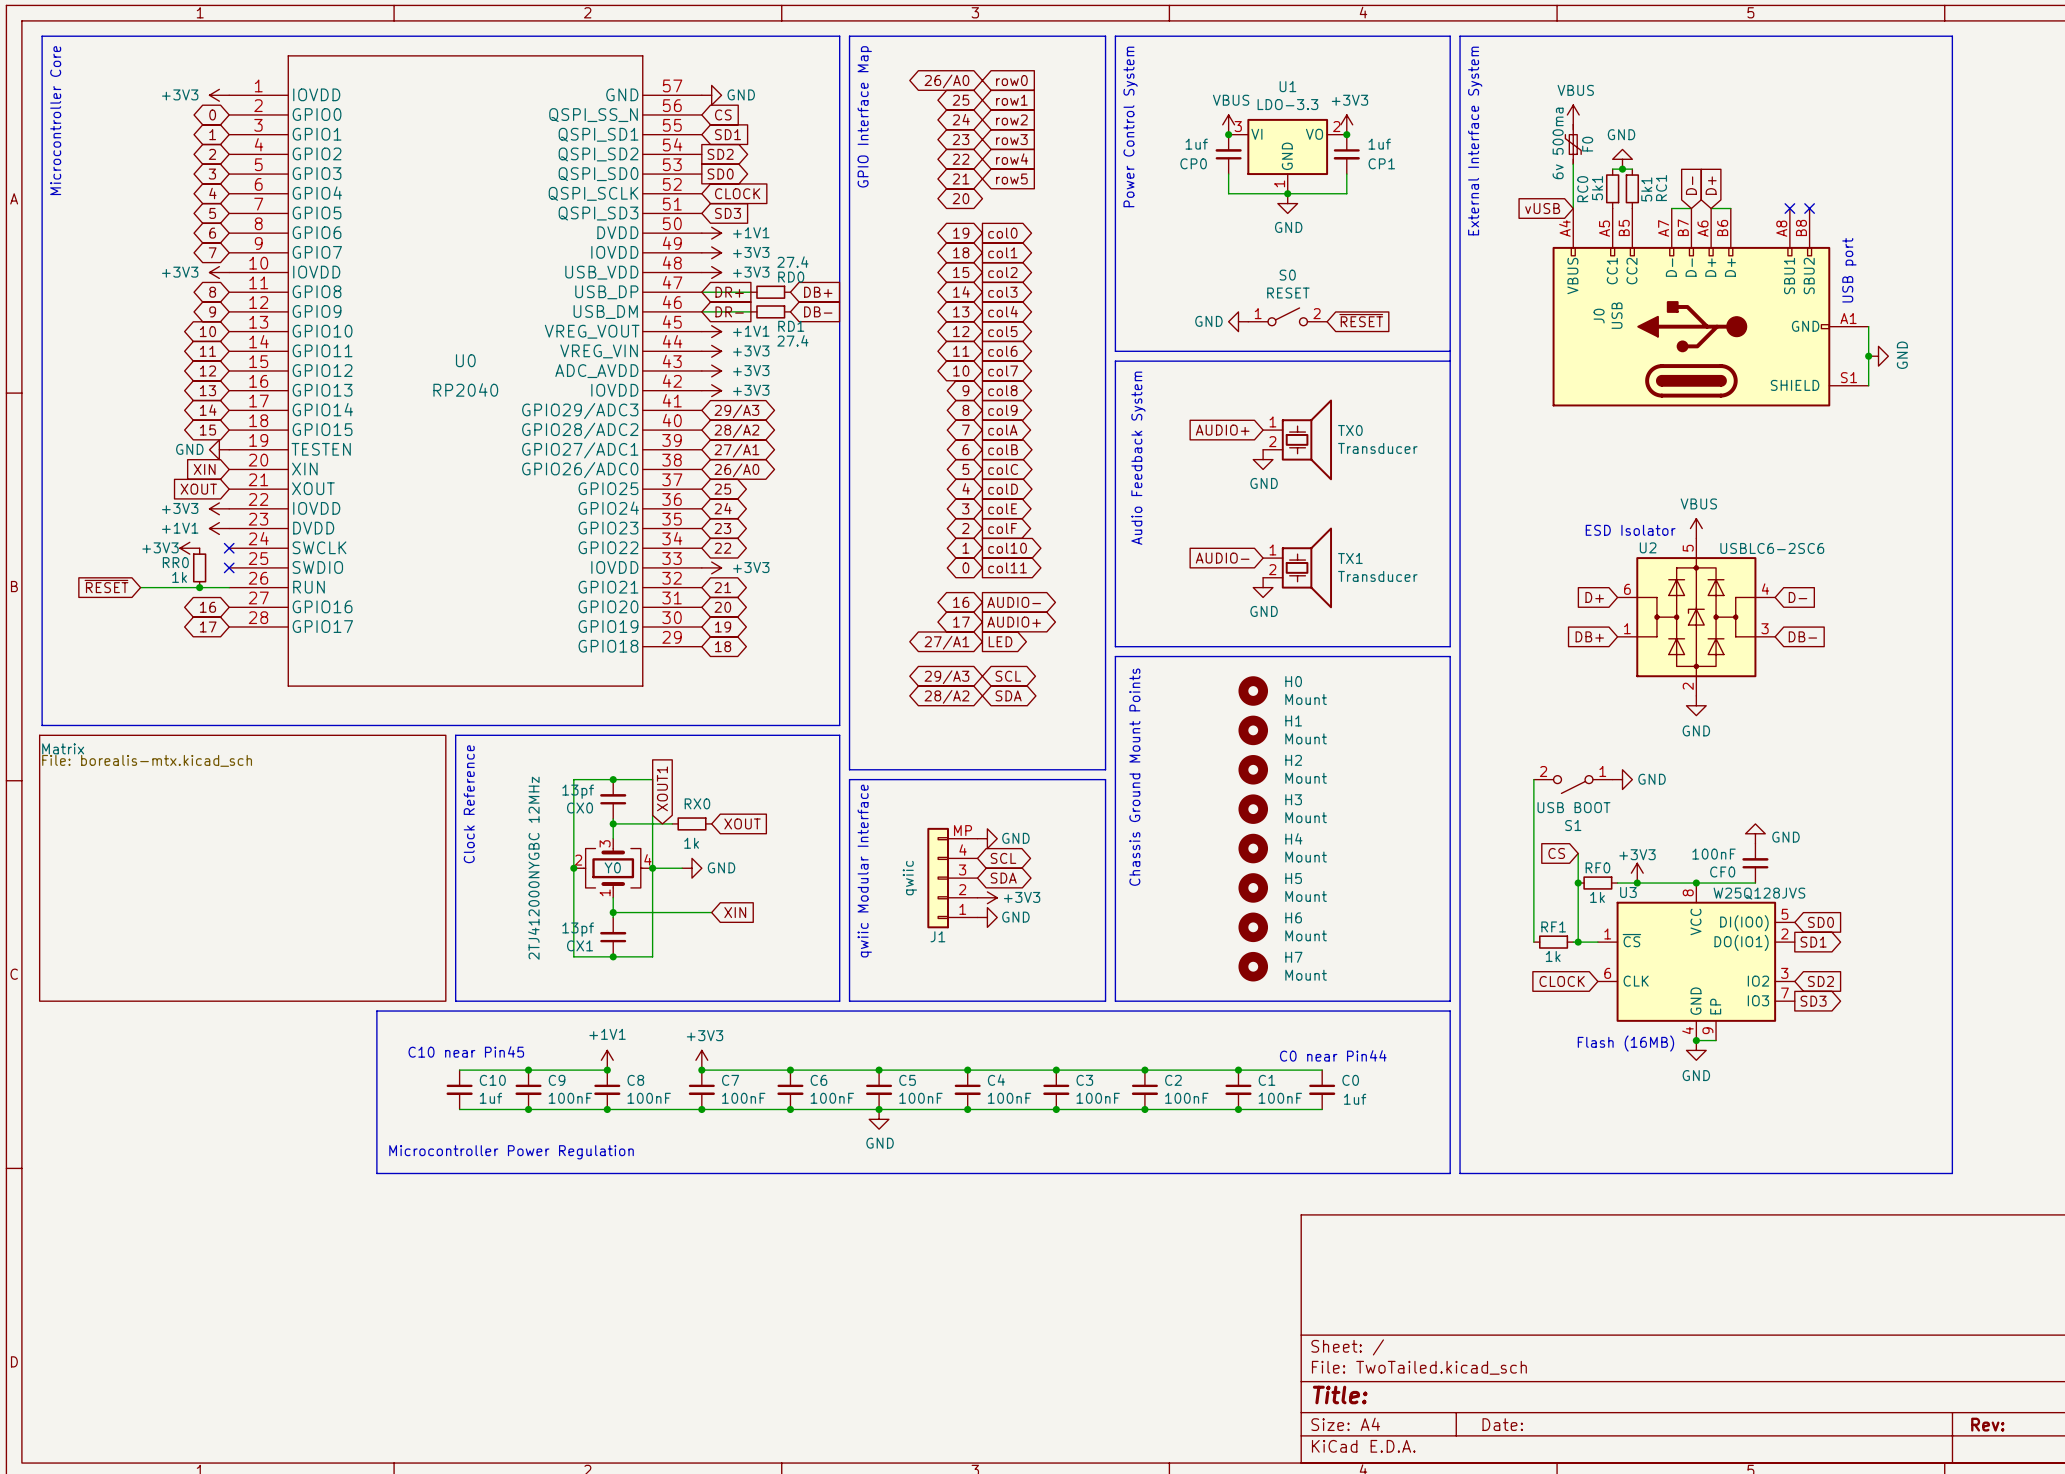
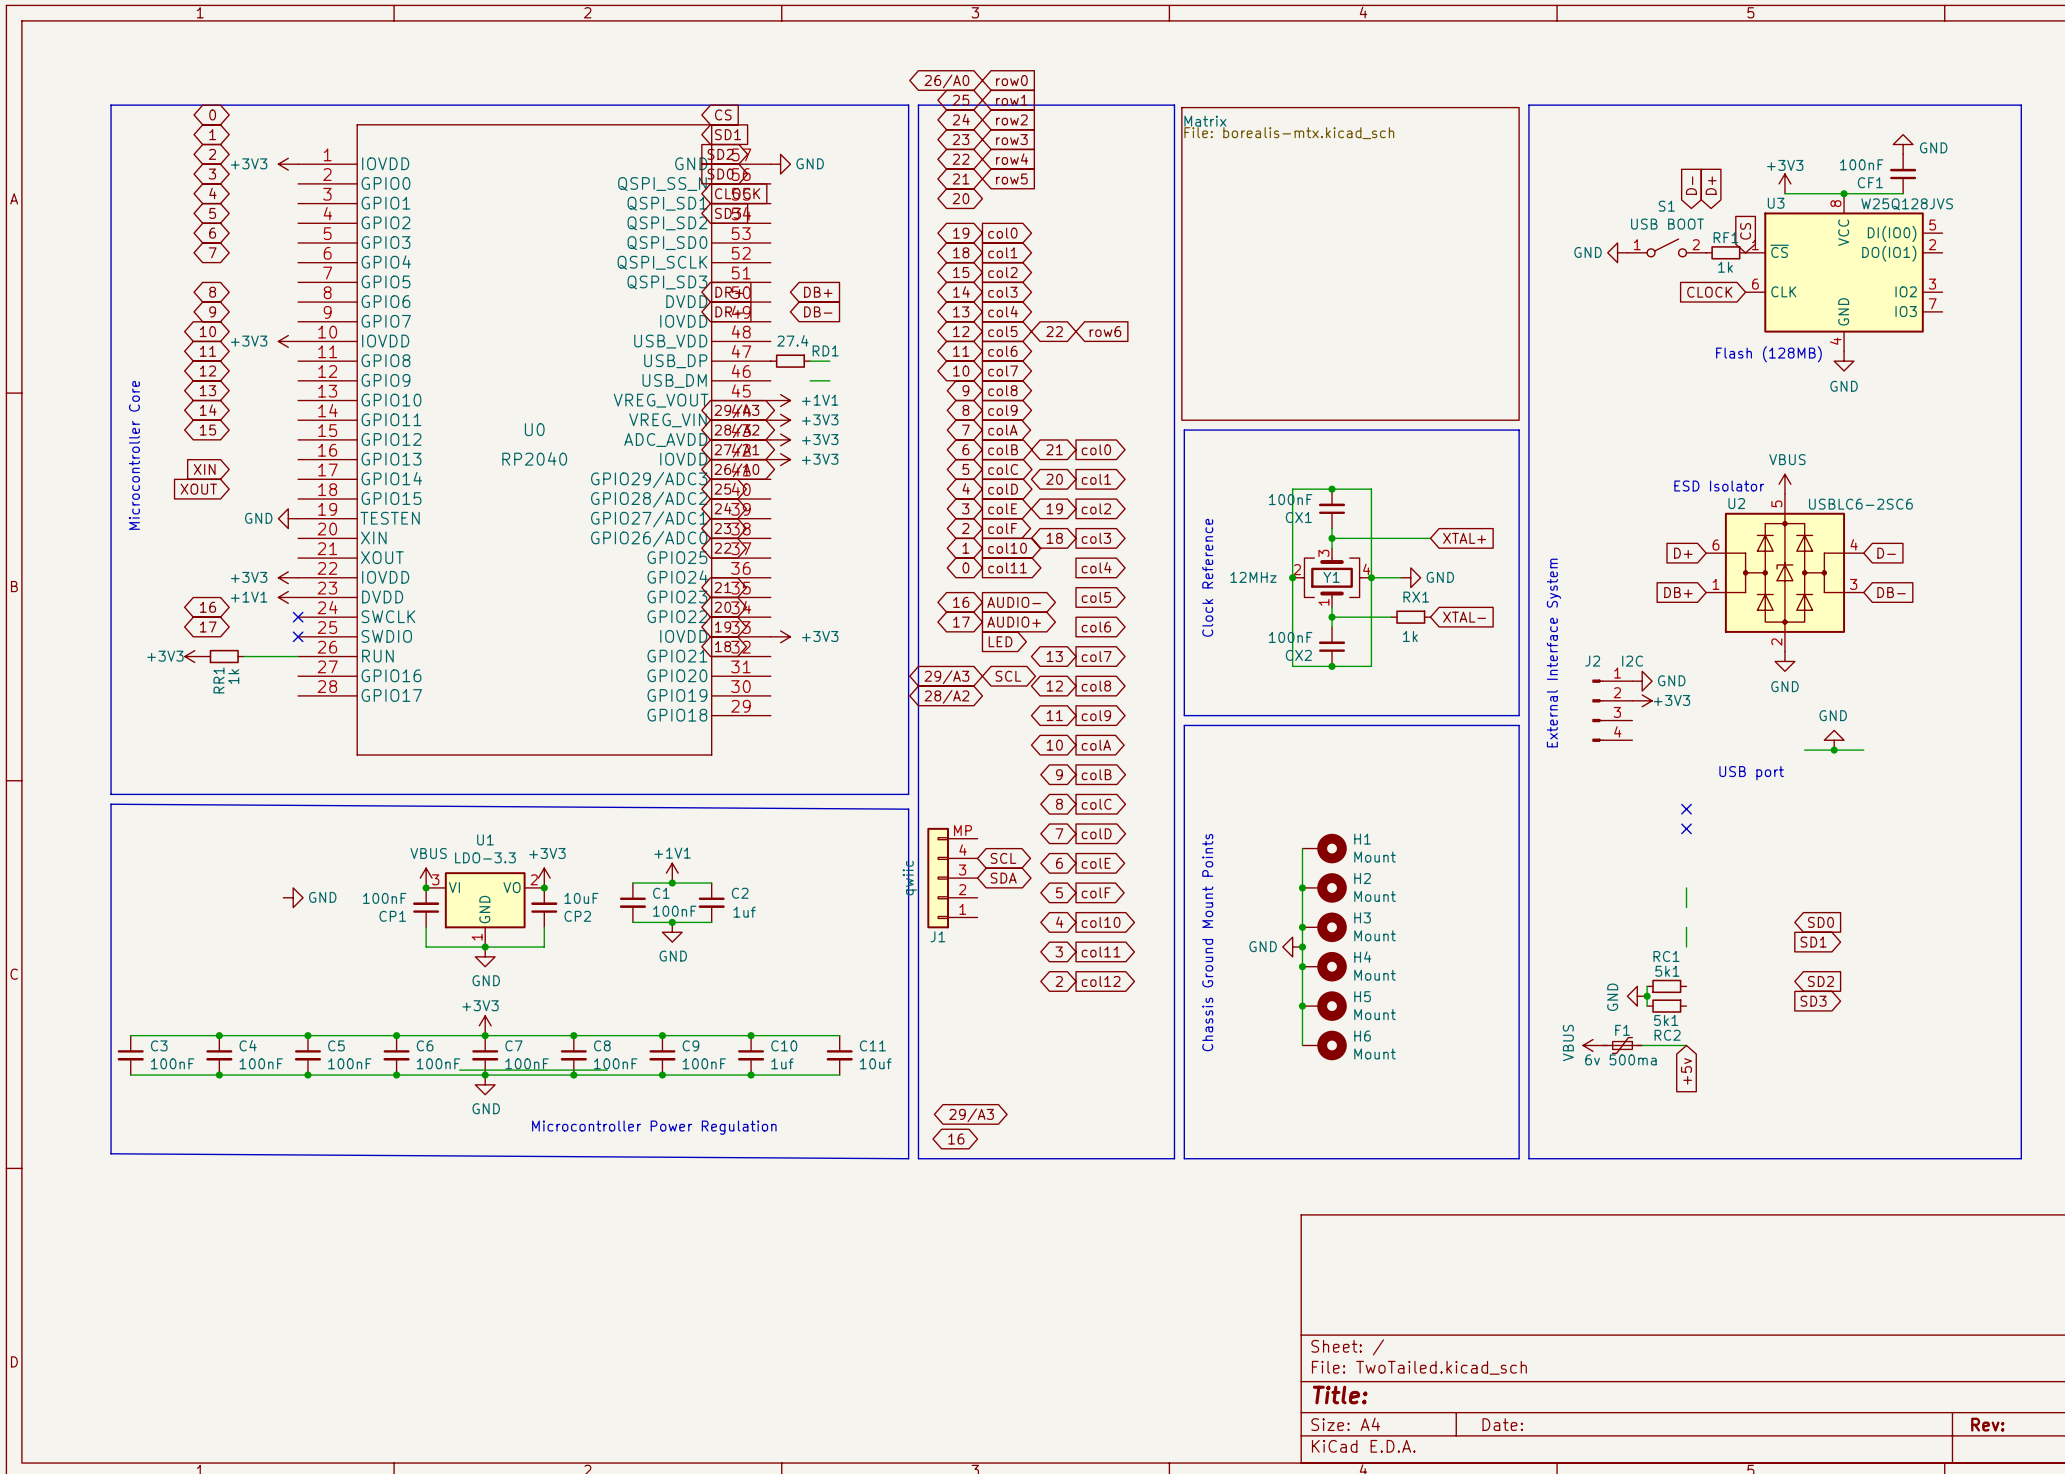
line: (42, 36) (839, 36) (839, 725) (42, 725) (42, 36) -> (111, 105) (908, 105) (908, 794) (111, 794) (111, 105)
line: (849, 36) (1105, 36) (1105, 769) (849, 769) (849, 36) -> none
line: (1460, 36) (1952, 36) (1952, 1173) (1460, 1173) (1460, 36) -> (1528, 105) (1528, 1158) (2021, 1158) (2021, 105) (1528, 105)
power symbol: +3V3 (219, 95) -> none
power symbol position: GND (711, 95) -> GND (780, 164)
line: none -> (918, 105) (1174, 105) (1174, 1158) (918, 1158) (918, 105)
power symbol: VBUS (1573, 114) -> none
text: GPIO Interface Map (864, 116) -> none
text: Microcontroller Core (55, 120) -> none
power symbol: VBUS (1228, 124) -> none
power symbol: +3V3 (1346, 124) -> none
text: Power Control System (1130, 126) -> none
junction: (1228, 134) -> none
junction: (1346, 134) -> none
text: External Interface System (1475, 141) -> none
CP1 value: 1uf (1379, 144) -> 100nF (384, 898)
F0: 6v 500ma (1573, 144) -> none
power symbol: none -> GND (1903, 144)
CP0: 1uf (1228, 154) -> none
CP1 rotation: 0° (1346, 154) -> 180° (426, 907)
CP1 position: (1346, 154) -> (426, 907)
U1 position: (1287, 156) -> (485, 909)
power symbol rotation: 0° (1622, 159) -> 90° counterclockwise (1617, 252)
power symbol position: GND (1622, 159) -> GND (1617, 252)
CP1 name position: CP1 (1381, 163) -> CP1 (392, 916)
power symbol: none -> +3V3 (288, 164)
wire: (1573, 164) (1573, 208) -> none
wire: (1612, 169) (1632, 169) -> none
junction: (1622, 169) -> none
wire: (1228, 174) (1228, 193) (1346, 193) (1346, 174) -> none
CF1: none -> 100nF (1903, 174)
power symbol: none -> +3V3 (1784, 183)
RC0: 5k1 (1612, 188) -> none
RC1 rotation: 0° (1632, 188) -> 90° clockwise (1666, 986)
RC1 position: (1632, 188) -> (1666, 986)
RC1 name position: RC1 (1661, 188) -> RC1 (1666, 956)
RC1 value position: 5k1 (1646, 189) -> 5k1 (1667, 971)
junction: (1287, 193) -> none
wire: none -> (1784, 193) (1903, 193)
junction: none -> (1844, 193)
power symbol: GND (1287, 203) -> none
global label: vUSB (1542, 208) -> none
wire: (1671, 208) (1691, 208) -> none
wire: (1711, 208) (1730, 208) -> none
no-connect mark: (1789, 208) -> none
no-connect mark: (1809, 208) -> none
global label: none -> CS (1745, 231)
power symbol: +1V1 (711, 233) -> none
power symbol: +3V3 (711, 252) -> none
sheet Matrix: none -> File: borealis-mtx.kicad_sch (1350, 263)
text: USB port (1849, 270) -> none
power symbol: +3V3 (219, 272) -> none
power symbol: +3V3 (711, 272) -> none
wire: (701, 292) (751, 292) -> none
RD0: 27.4 (770, 292) -> none
global label: none -> CLOCK (1709, 292)
J0: USB (1710, 307) -> none
wire: (701, 311) (751, 311) -> none
RD1 position: (770, 311) -> (790, 361)
S0: RESET (1287, 316) -> none
global label: ~{RESET} (1361, 320) -> none
power symbol: GND (1238, 321) -> none
RD1 name position: RD1 (791, 326) -> RD1 (825, 350)
wire: (1868, 326) (1868, 385) -> none
power symbol: +1V1 (711, 331) -> none
global label: none -> 22 (1054, 331)
global label: none -> row6 (1105, 331)
power symbol: none -> +3V3 (288, 341)
power symbol: +3V3 (711, 351) -> none
line: (1450, 351) (1115, 351) (1115, 36) (1450, 36) (1450, 646) (1115, 646) (1115, 361) (1450, 361) -> none
text: none -> Flash (128MB) (1768, 354)
junction: (1868, 356) -> none
power symbol rotation: 0° (1878, 356) -> 90° clockwise (1844, 361)
power symbol position: GND (1878, 356) -> GND (1844, 361)
wire: none -> (810, 361) (829, 361)
U0 position: (465, 370) -> (534, 439)
power symbol: +3V3 (711, 370) -> none
wire: none -> (810, 380) (829, 380)
power symbol: +3V3 (711, 390) -> none
power symbol: none -> +1V1 (780, 400)
power symbol: none -> +3V3 (780, 420)
line: none -> (1184, 430) (1184, 715) (1519, 715) (1519, 430) (1184, 430)
global label: AUDIO+ (1222, 430) -> none
power symbol: none -> +3V3 (780, 439)
TX0: Transducer (1297, 439) -> none
power symbol position: GND (219, 449) -> GND (288, 518)
global label: none -> 21 (1054, 449)
global label: none -> col0 (1096, 449)
text: none -> Microcontroller Core (134, 455)
text: Audio Feedback System (1138, 458) -> none
power symbol: none -> +3V3 (780, 459)
power symbol: GND (1263, 459) -> none
global label: none -> 20 (1054, 479)
global label: none -> col1 (1096, 479)
wire: none -> (1292, 489) (1371, 489) (1371, 666) (1292, 666) (1292, 489)
junction: none -> (1332, 489)
power symbol: +3V3 (219, 508) -> none
global label: none -> 19 (1054, 508)
global label: none -> col2 (1096, 508)
power symbol position: +1V1 (219, 528) -> +1V1 (288, 597)
power symbol position: VBUS (1696, 528) -> VBUS (1784, 484)
text position: ESD Isolator (1630, 530) -> ESD Isolator (1719, 486)
global label: none -> 18 (1054, 538)
global label: none -> col3 (1096, 538)
wire: none -> (1332, 538) (1430, 538)
junction: none -> (1332, 538)
global label: none -> XTAL+ (1464, 538)
power symbol: +3V3 (189, 548) -> none
no-connect mark: (229, 548) -> none
global label: AUDIO- (1222, 558) -> none
RR0: 1k (199, 567) -> none
no-connect mark: (229, 567) -> none
power symbol: +3V3 (711, 567) -> none
global label: none -> col4 (1096, 567)
TX1: Transducer (1297, 567) -> none
power symbol: none -> +3V3 (288, 577)
text: none -> Clock Reference (1207, 577)
junction: none -> (1292, 577)
Y1: none -> 12MHz (1332, 577)
wire: none -> (1371, 577) (1400, 577)
junction: none -> (1371, 577)
power symbol: none -> GND (1410, 577)
global label: ~{RESET} (106, 586) -> none
wire: (140, 587) (229, 587) -> none
junction: (199, 587) -> none
power symbol: GND (1263, 587) -> none
global label: none -> col5 (1096, 597)
global label position: D+ (1594, 597) -> D+ (1683, 553)
global label position: D- (1797, 597) -> D- (1886, 553)
wire: none -> (1332, 607) (1332, 627)
no-connect mark: none -> (298, 617)
wire: none -> (1332, 617) (1391, 617)
junction: none -> (1332, 617)
RX1: none -> 1k (1410, 617)
global label: none -> XTAL- (1464, 617)
U2 position: (1696, 617) -> (1784, 572)
global label: none -> col6 (1096, 627)
no-connect mark: none -> (298, 636)
power symbol: none -> +3V3 (780, 636)
global label position: DB+ (1589, 636) -> DB+ (1678, 592)
global label position: DB- (1802, 636) -> DB- (1891, 592)
global label: 27/A1 (946, 642) -> none
CX2: none -> 100nF (1332, 646)
text: none -> External Interface System (1554, 653)
power symbol: none -> +3V3 (194, 656)
RR1: none -> 1k (224, 656)
wire: none -> (243, 656) (298, 656)
global label: none -> 13 (1054, 656)
global label: none -> col7 (1096, 656)
line: (1115, 656) (1115, 1001) (1450, 1001) (1450, 656) (1115, 656) -> none
power symbol: none -> GND (1784, 661)
junction: none -> (1332, 666)
power symbol: none -> GND (1642, 681)
global label: none -> 12 (1054, 686)
global label: none -> col8 (1096, 686)
H0: Mount (1253, 691) -> none
global label: SDA (1008, 695) -> none
power symbol: GND (1696, 705) -> none
J2: none -> I2C (1612, 710)
global label: none -> 11 (1054, 715)
global label: none -> col9 (1096, 715)
H1 symbol: [1238, 715, 1269, 746] -> [1302, 833, 1347, 864]
line: none -> (1184, 725) (1184, 1158) (1519, 1158) (1519, 725) (1184, 725)
line: (455, 735) (455, 1001) (839, 1001) (839, 735) (455, 735) -> none
power symbol: none -> GND (1834, 740)
global label: none -> 10 (1054, 745)
global label: none -> colA (1096, 745)
wire: none -> (1804, 750) (1863, 750)
junction: none -> (1834, 750)
H2 symbol: [1238, 755, 1269, 785] -> [1302, 873, 1347, 903]
text: none -> USB port (1751, 773)
global label: none -> 9 (1059, 774)
global label: none -> colB (1096, 774)
text position: Chassis Ground Mount Points (1134, 777) -> Chassis Ground Mount Points (1207, 942)
wire: (573, 779) (652, 779) (652, 956) (573, 956) (573, 779) -> none
junction: (613, 779) -> none
line: (849, 779) (1105, 779) (1105, 1001) (849, 1001) (849, 779) -> none
wire: (1533, 779) (1533, 942) -> none
power symbol: GND (1622, 779) -> none
S1 rotation: 0° (1573, 784) -> 180° (1666, 247)
S1 position: (1573, 784) -> (1666, 247)
global label: XOUT1 (662, 788) -> none
H3 symbol: [1238, 794, 1269, 824] -> [1302, 912, 1347, 943]
CX0: 13pf (613, 799) -> none
line: none -> (111, 804) (908, 809) (908, 1158) (111, 1153) (111, 804)
text: Clock Reference (469, 804) -> none
global label: none -> 8 (1059, 804)
global label: none -> colC (1096, 804)
no-connect mark: none -> (1686, 809)
wire: (613, 819) (613, 838) -> none
wire: (613, 823) (672, 823) -> none
junction: (613, 823) -> none
RX0: 1k (691, 823) -> none
global label: XOUT (742, 823) -> none
no-connect mark: none -> (1686, 828)
global label: none -> 7 (1059, 833)
global label: none -> colD (1096, 833)
H4 symbol: [1238, 833, 1269, 864] -> [1302, 951, 1347, 982]
power symbol: GND (1755, 833) -> none
power symbol: GND (987, 838) -> none
wire: none -> (1302, 848) (1302, 1045)
global label: CS (1556, 853) -> none
wire: (1578, 853) (1578, 942) -> none
global label: none -> 6 (1059, 863)
global label: none -> colE (1096, 863)
CF0: 100nF (1755, 863) -> none
sheet Matrix: File: borealis-mtx.kicad_sch (242, 868) -> none
junction position: (573, 868) -> (544, 887)
Y0: 2TJ412000NYGBC 12MHz (613, 868) -> none
wire: (652, 868) (682, 868) -> none
junction position: (652, 868) -> (672, 883)
power symbol rotation: 0° (691, 868) -> 90° clockwise (672, 932)
power symbol position: GND (691, 868) -> GND (672, 932)
text: qwiic Modular Interface (864, 871) -> none
power symbol: none -> +1V1 (672, 873)
H5 symbol: [1238, 873, 1269, 903] -> [1302, 991, 1347, 1021]
power symbol rotation: 0° (1637, 873) -> 90° clockwise (1642, 700)
power symbol position: +3V3 (1637, 873) -> +3V3 (1642, 700)
power symbol: none -> VBUS (426, 878)
power symbol: none -> +3V3 (544, 878)
wire: none -> (632, 883) (711, 883)
junction: (1578, 883) -> none
U3 symbol: [1597, 883, 1795, 1041] -> [1745, 193, 1943, 352]
RF0: 1k (1597, 883) -> none
wire: (1617, 883) (1755, 883) -> none
junction: (1637, 883) -> none
junction: (1696, 883) -> none
junction: none -> (426, 887)
junction: none -> (1302, 887)
wire: none -> (1686, 887) (1686, 907)
global label: none -> 5 (1059, 892)
global label: none -> colF (1096, 892)
power symbol: none -> GND (293, 897)
wire: (613, 897) (613, 917) -> none
power symbol: +3V3 (987, 897) -> none
CP2: none -> 10uF (544, 907)
wire: (613, 912) (711, 912) -> none
junction: (613, 912) -> none
global label: XIN (735, 912) -> none
H6 symbol: [1238, 912, 1269, 943] -> [1302, 1030, 1347, 1061]
power symbol: GND (987, 917) -> none
wire: none -> (632, 922) (711, 922)
junction: none -> (672, 922)
global label: none -> 4 (1059, 922)
global label: none -> col10 (1101, 922)
wire: none -> (426, 927) (426, 947) (544, 947) (544, 927)
junction: none -> (1302, 927)
CX1 value: 13pf (578, 929) -> 100nF (1290, 499)
CX1 position: (613, 937) -> (1332, 508)
RF1 position: (1553, 942) -> (1725, 252)
wire: (1573, 942) (1597, 942) -> none
junction: (1578, 942) -> none
junction: none -> (485, 947)
power symbol: none -> GND (1292, 947)
junction: none -> (1302, 947)
global label: none -> 3 (1059, 951)
global label: none -> col11 (1101, 951)
power symbol: none -> GND (485, 956)
junction: (613, 956) -> none
H7: Mount (1253, 966) -> none
junction: none -> (1302, 966)
global label: none -> 2 (1059, 981)
global label: none -> col12 (1101, 981)
global label: CLOCK (1562, 981) -> none
junction: none -> (1647, 996)
junction: none -> (1302, 1006)
RC2: none -> 5k1 (1666, 1006)
line: (376, 1011) (376, 1173) (1450, 1173) (1450, 1011) (376, 1011) -> none
power symbol: none -> +3V3 (485, 1025)
wire: none -> (130, 1035) (839, 1035)
junction: none -> (219, 1035)
junction: none -> (307, 1035)
junction: none -> (396, 1035)
junction: none -> (485, 1035)
junction: none -> (573, 1035)
junction: none -> (662, 1035)
junction: none -> (751, 1035)
wire: (1696, 1040) (1716, 1040) -> none
junction: (1696, 1040) -> none
text: Flash (16MB) (1625, 1043) -> none
power symbol: none -> VBUS (1592, 1045)
F1: none -> 6v 500ma (1622, 1045)
wire: none -> (1642, 1045) (1686, 1045)
power symbol rotation: 0° (1696, 1050) -> 90° clockwise (1637, 996)
power symbol position: GND (1696, 1050) -> GND (1637, 996)
text: C10 near Pin45 (466, 1051) -> none
C11: none -> 10uf (839, 1055)
text: C0 near Pin44 (1333, 1055) -> none
power symbol: +1V1 (607, 1060) -> none
power symbol: +3V3 (701, 1060) -> none
junction: (528, 1070) -> none
junction: (607, 1070) -> none
wire: (701, 1070) (1322, 1070) -> none
junction: (701, 1070) -> none
junction: (790, 1070) -> none
junction: (879, 1070) -> none
junction: (967, 1070) -> none
junction: (1056, 1070) -> none
junction: (1144, 1070) -> none
junction: (1238, 1070) -> none
global label: none -> +5v (1686, 1071)
wire: none -> (130, 1075) (839, 1075)
junction: none -> (219, 1075)
junction: none -> (307, 1075)
junction: none -> (396, 1075)
junction: none -> (485, 1075)
junction: none -> (573, 1075)
junction: none -> (662, 1075)
junction: none -> (751, 1075)
power symbol: none -> GND (485, 1084)
C10 position: (459, 1089) -> (751, 1055)
C9 position: (528, 1089) -> (662, 1055)
C8 position: (607, 1089) -> (573, 1055)
C7 position: (701, 1089) -> (485, 1055)
C6 position: (790, 1089) -> (396, 1055)
C5 position: (879, 1089) -> (307, 1055)
C4 position: (967, 1089) -> (219, 1055)
C3 position: (1056, 1089) -> (130, 1055)
C2 position: (1144, 1089) -> (711, 902)
C1 position: (1238, 1089) -> (632, 902)
C0: 1uf (1322, 1089) -> none
C2 value: 100nF (1186, 1098) -> 1uf (744, 912)
wire: (459, 1109) (1322, 1109) -> none
junction: (528, 1109) -> none
junction: (607, 1109) -> none
junction: (701, 1109) -> none
junction: (790, 1109) -> none
junction: (879, 1109) -> none
junction: (967, 1109) -> none
junction: (1056, 1109) -> none
junction: (1144, 1109) -> none
junction: (1238, 1109) -> none
global label: none -> 29/A3 (971, 1115)
power symbol: GND (879, 1119) -> none
global label: none -> 16 (956, 1139)
text position: Microcontroller Power Regulation (511, 1152) -> Microcontroller Power Regulation (654, 1127)

